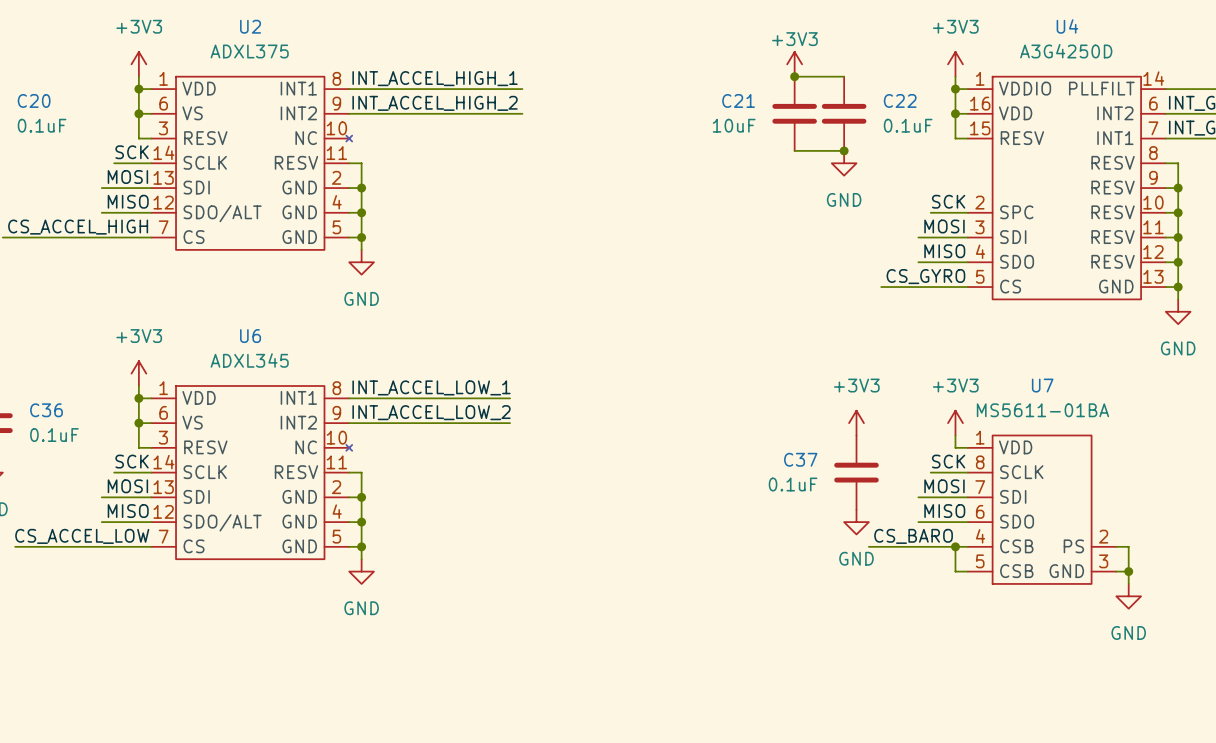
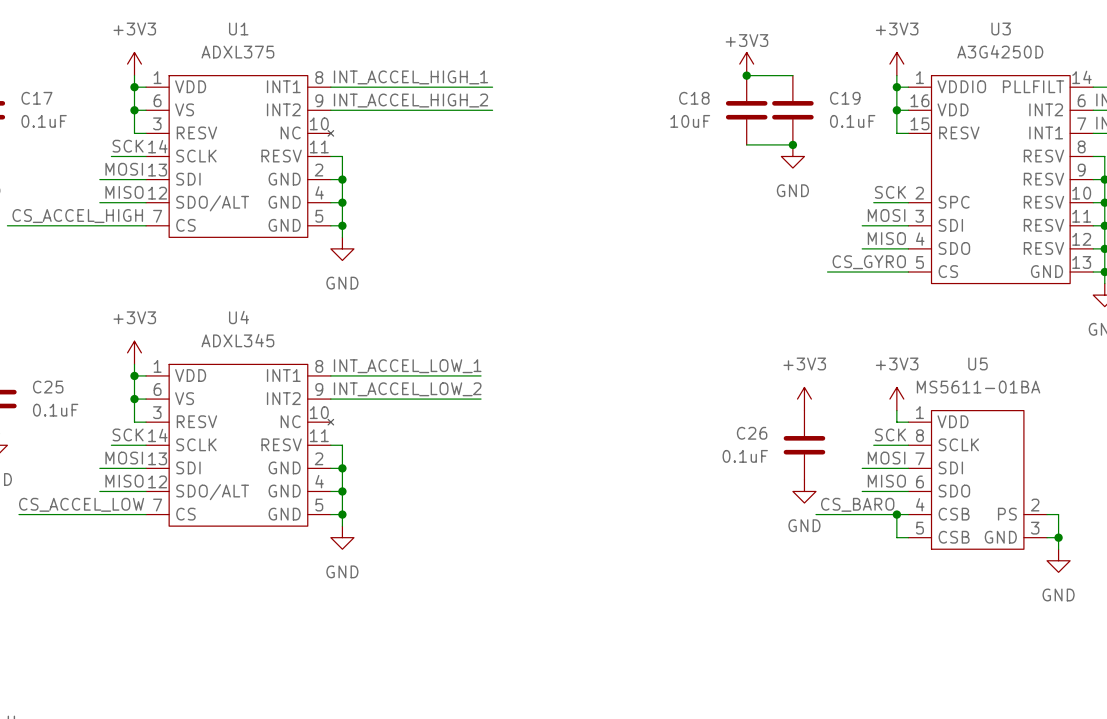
U2 name: U2 (250, 26) -> U1 (238, 28)
U4 name: U4 (1067, 26) -> U3 (1001, 28)
C20 name: C20 (34, 100) -> C17 (36, 98)
C21 name: C21 (738, 100) -> C18 (694, 98)
C22 name: C22 (900, 100) -> C19 (845, 98)
U6 name: U6 (250, 336) -> U4 (239, 317)
U7 name: U7 (1042, 385) -> U5 (977, 363)
C36 name: C36 (46, 410) -> C25 (48, 387)
C37 name: C37 (800, 459) -> C26 (752, 433)

